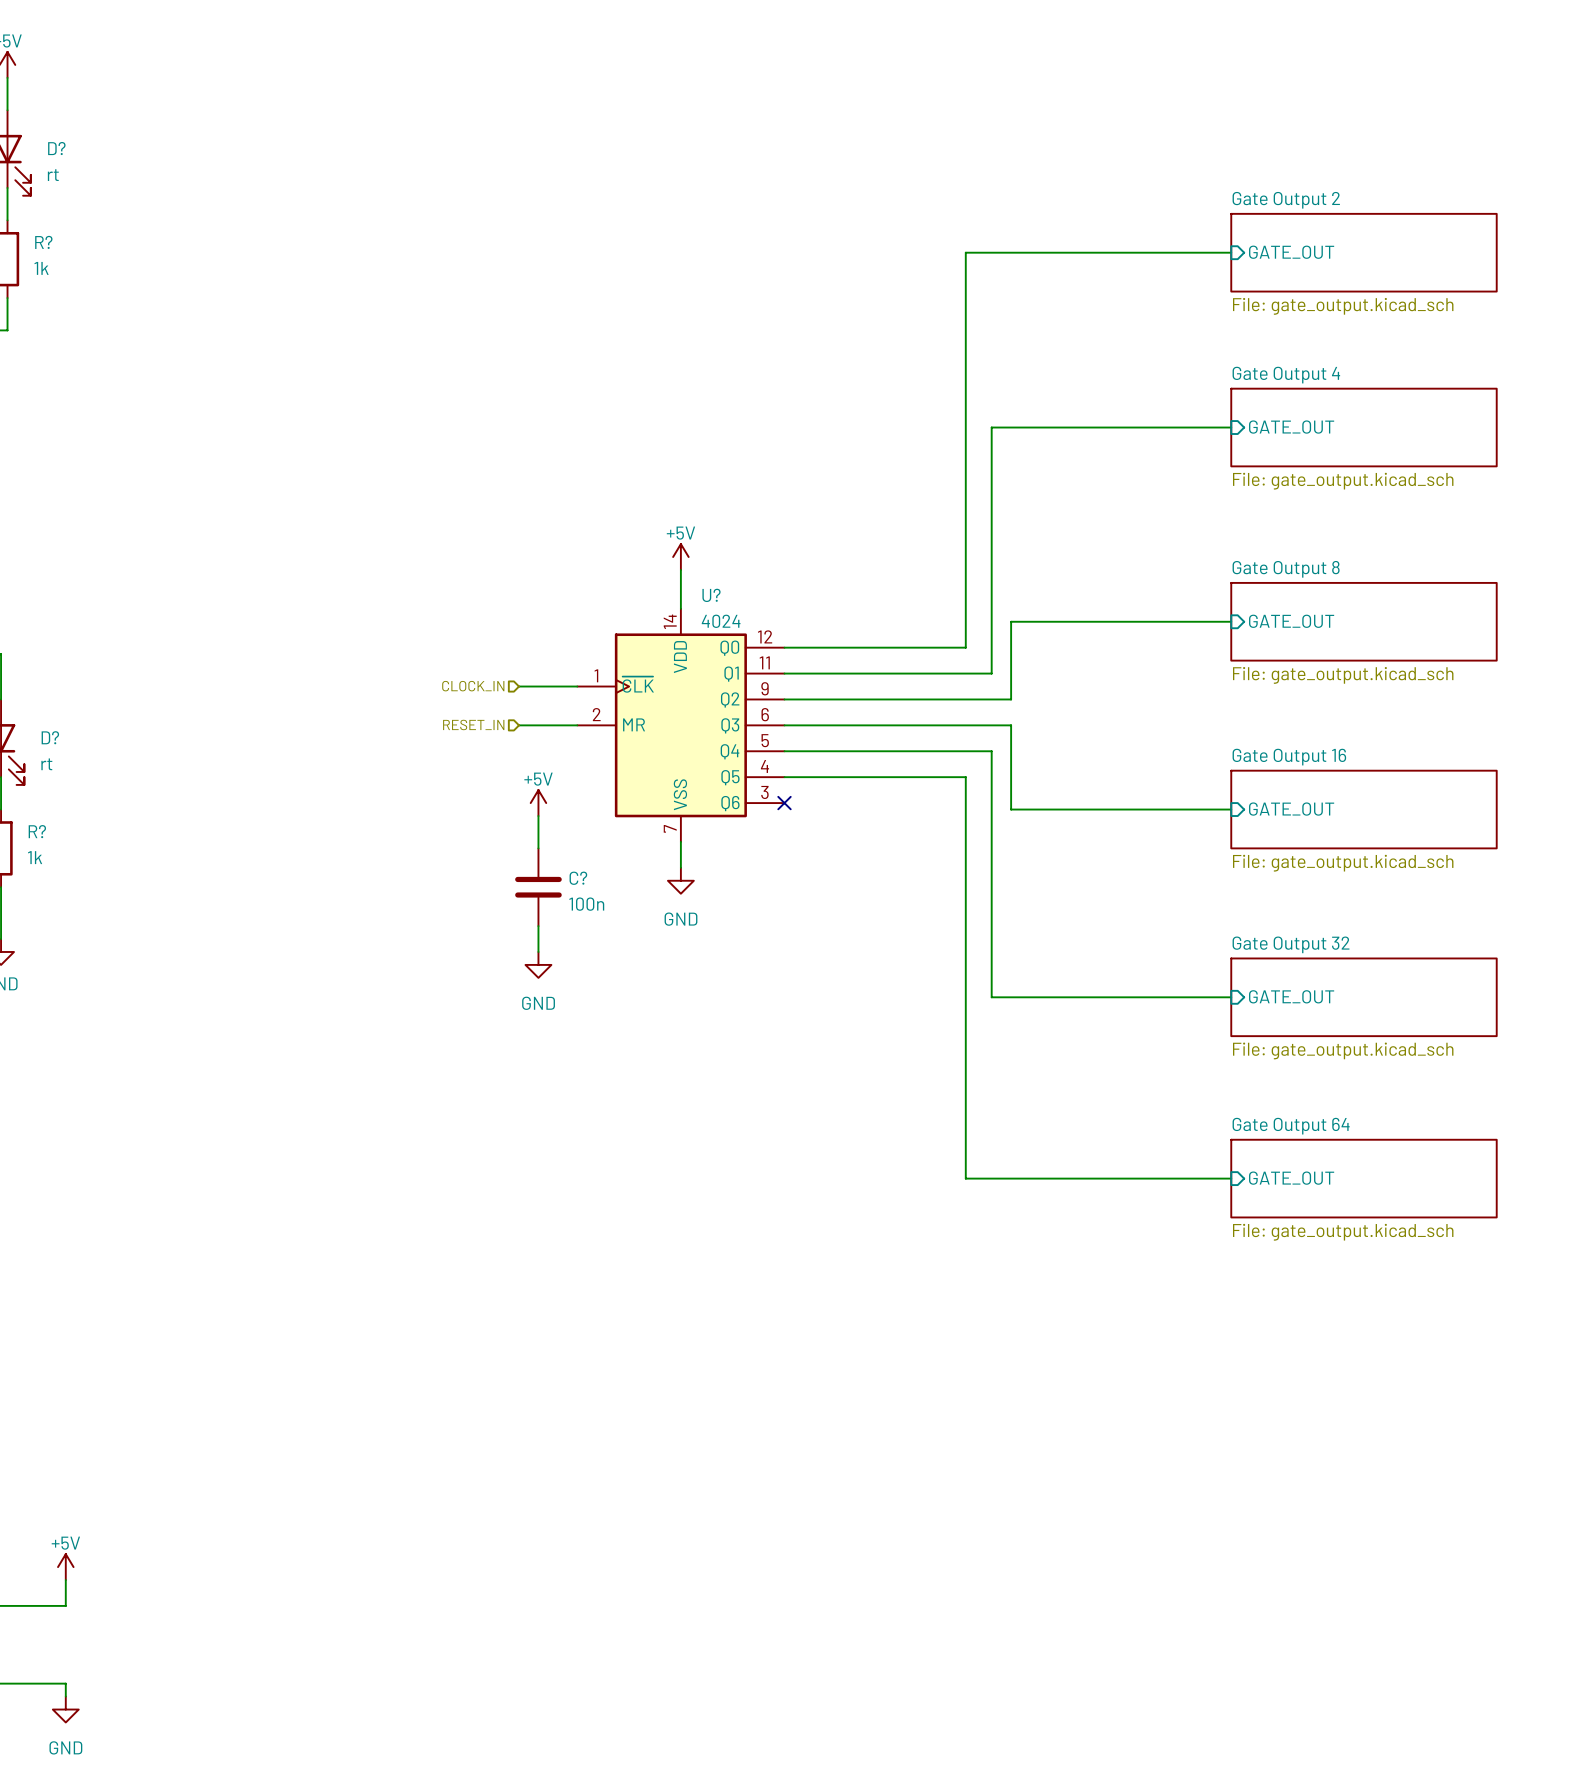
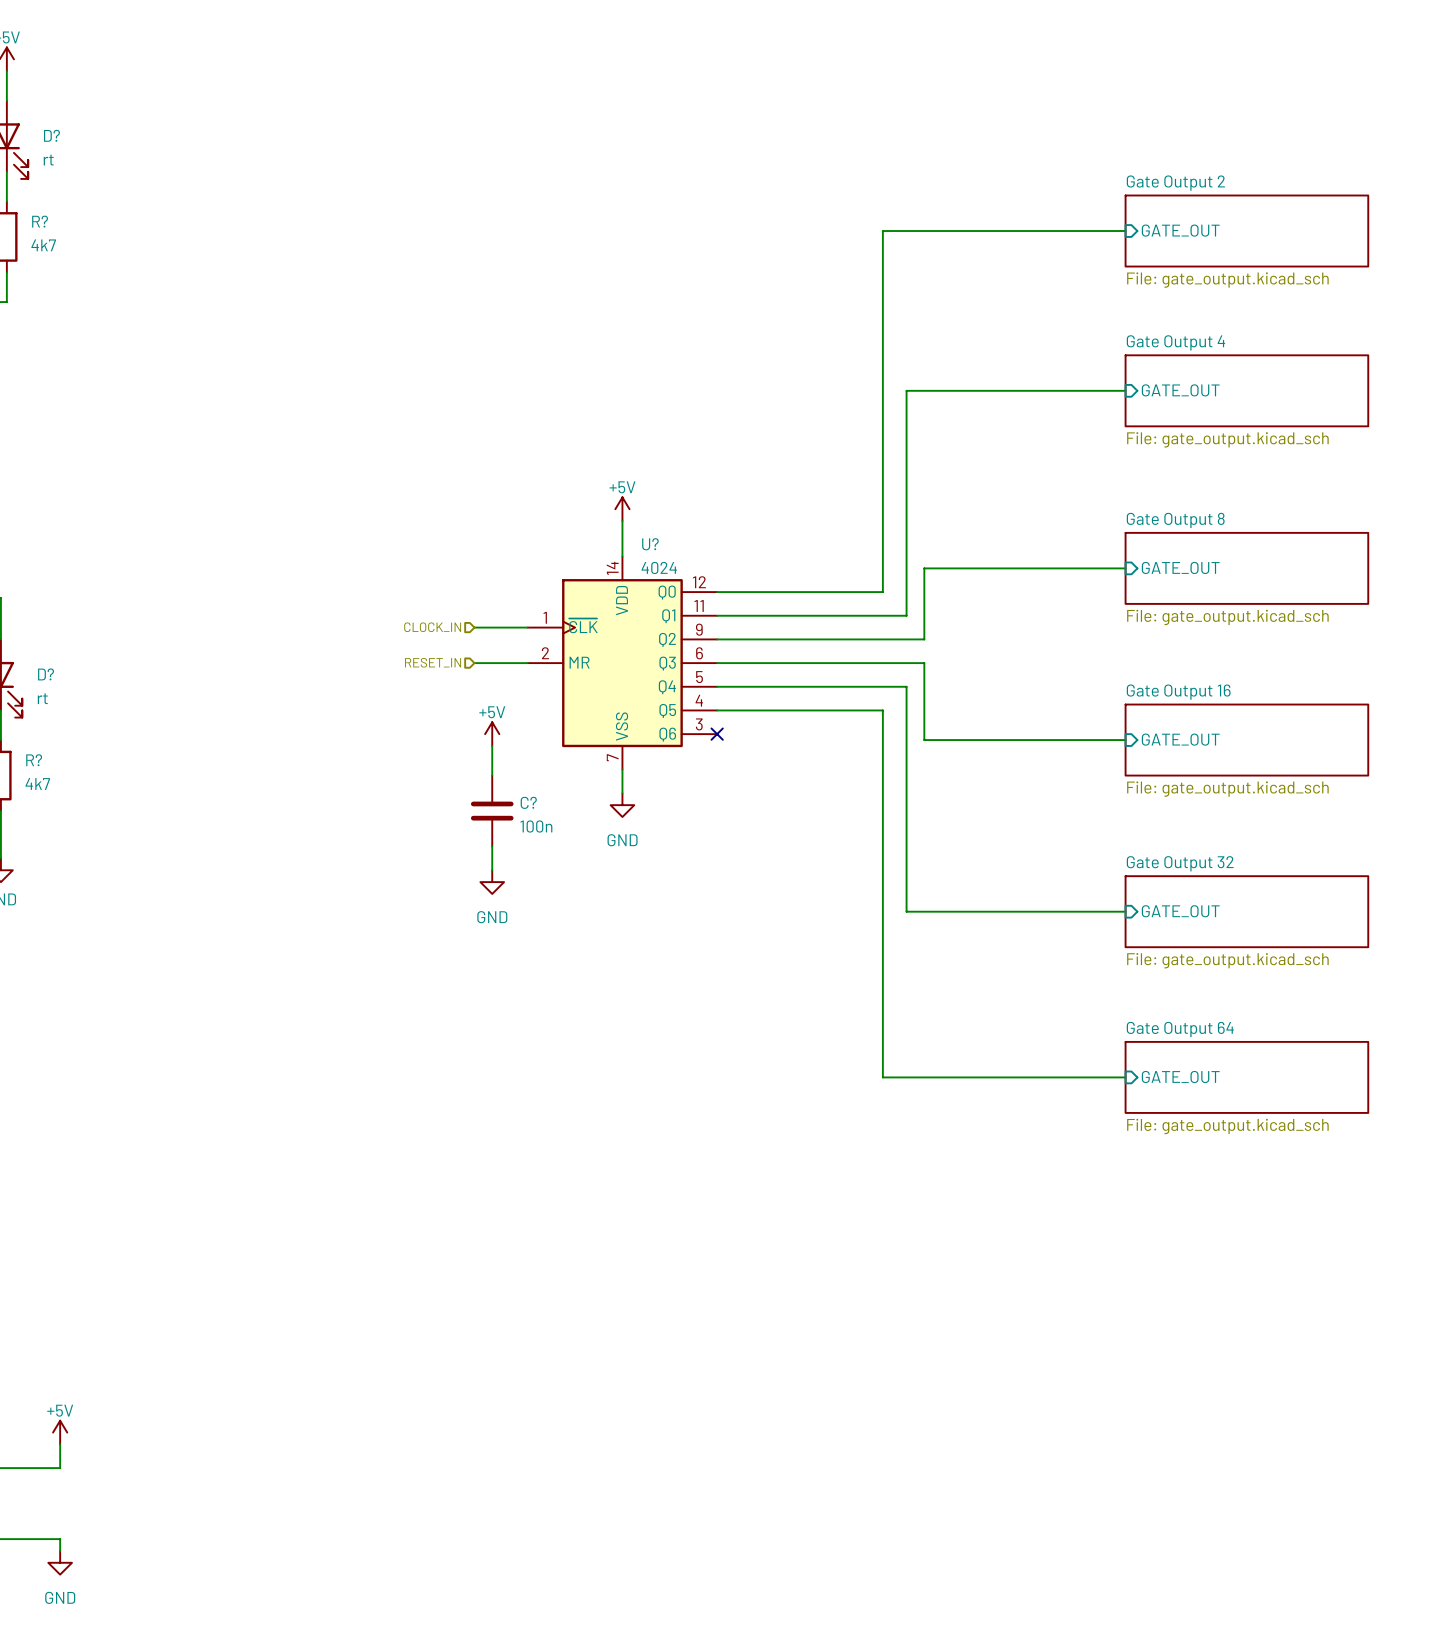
R? value: 1k (41, 268) -> 4k7 (43, 245)
R? value: 1k (35, 857) -> 4k7 (37, 784)

